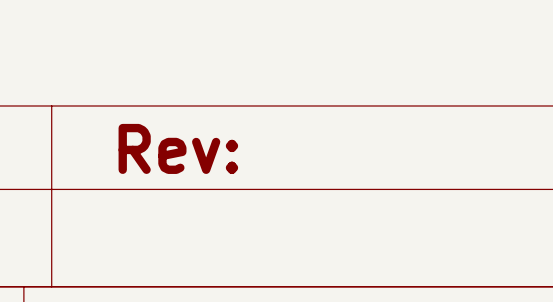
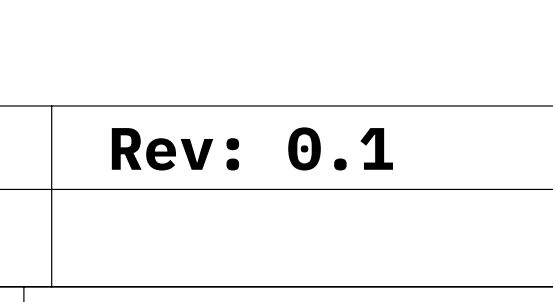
title block: Rev: (178, 148) -> Rev: 0.1 (252, 148)

